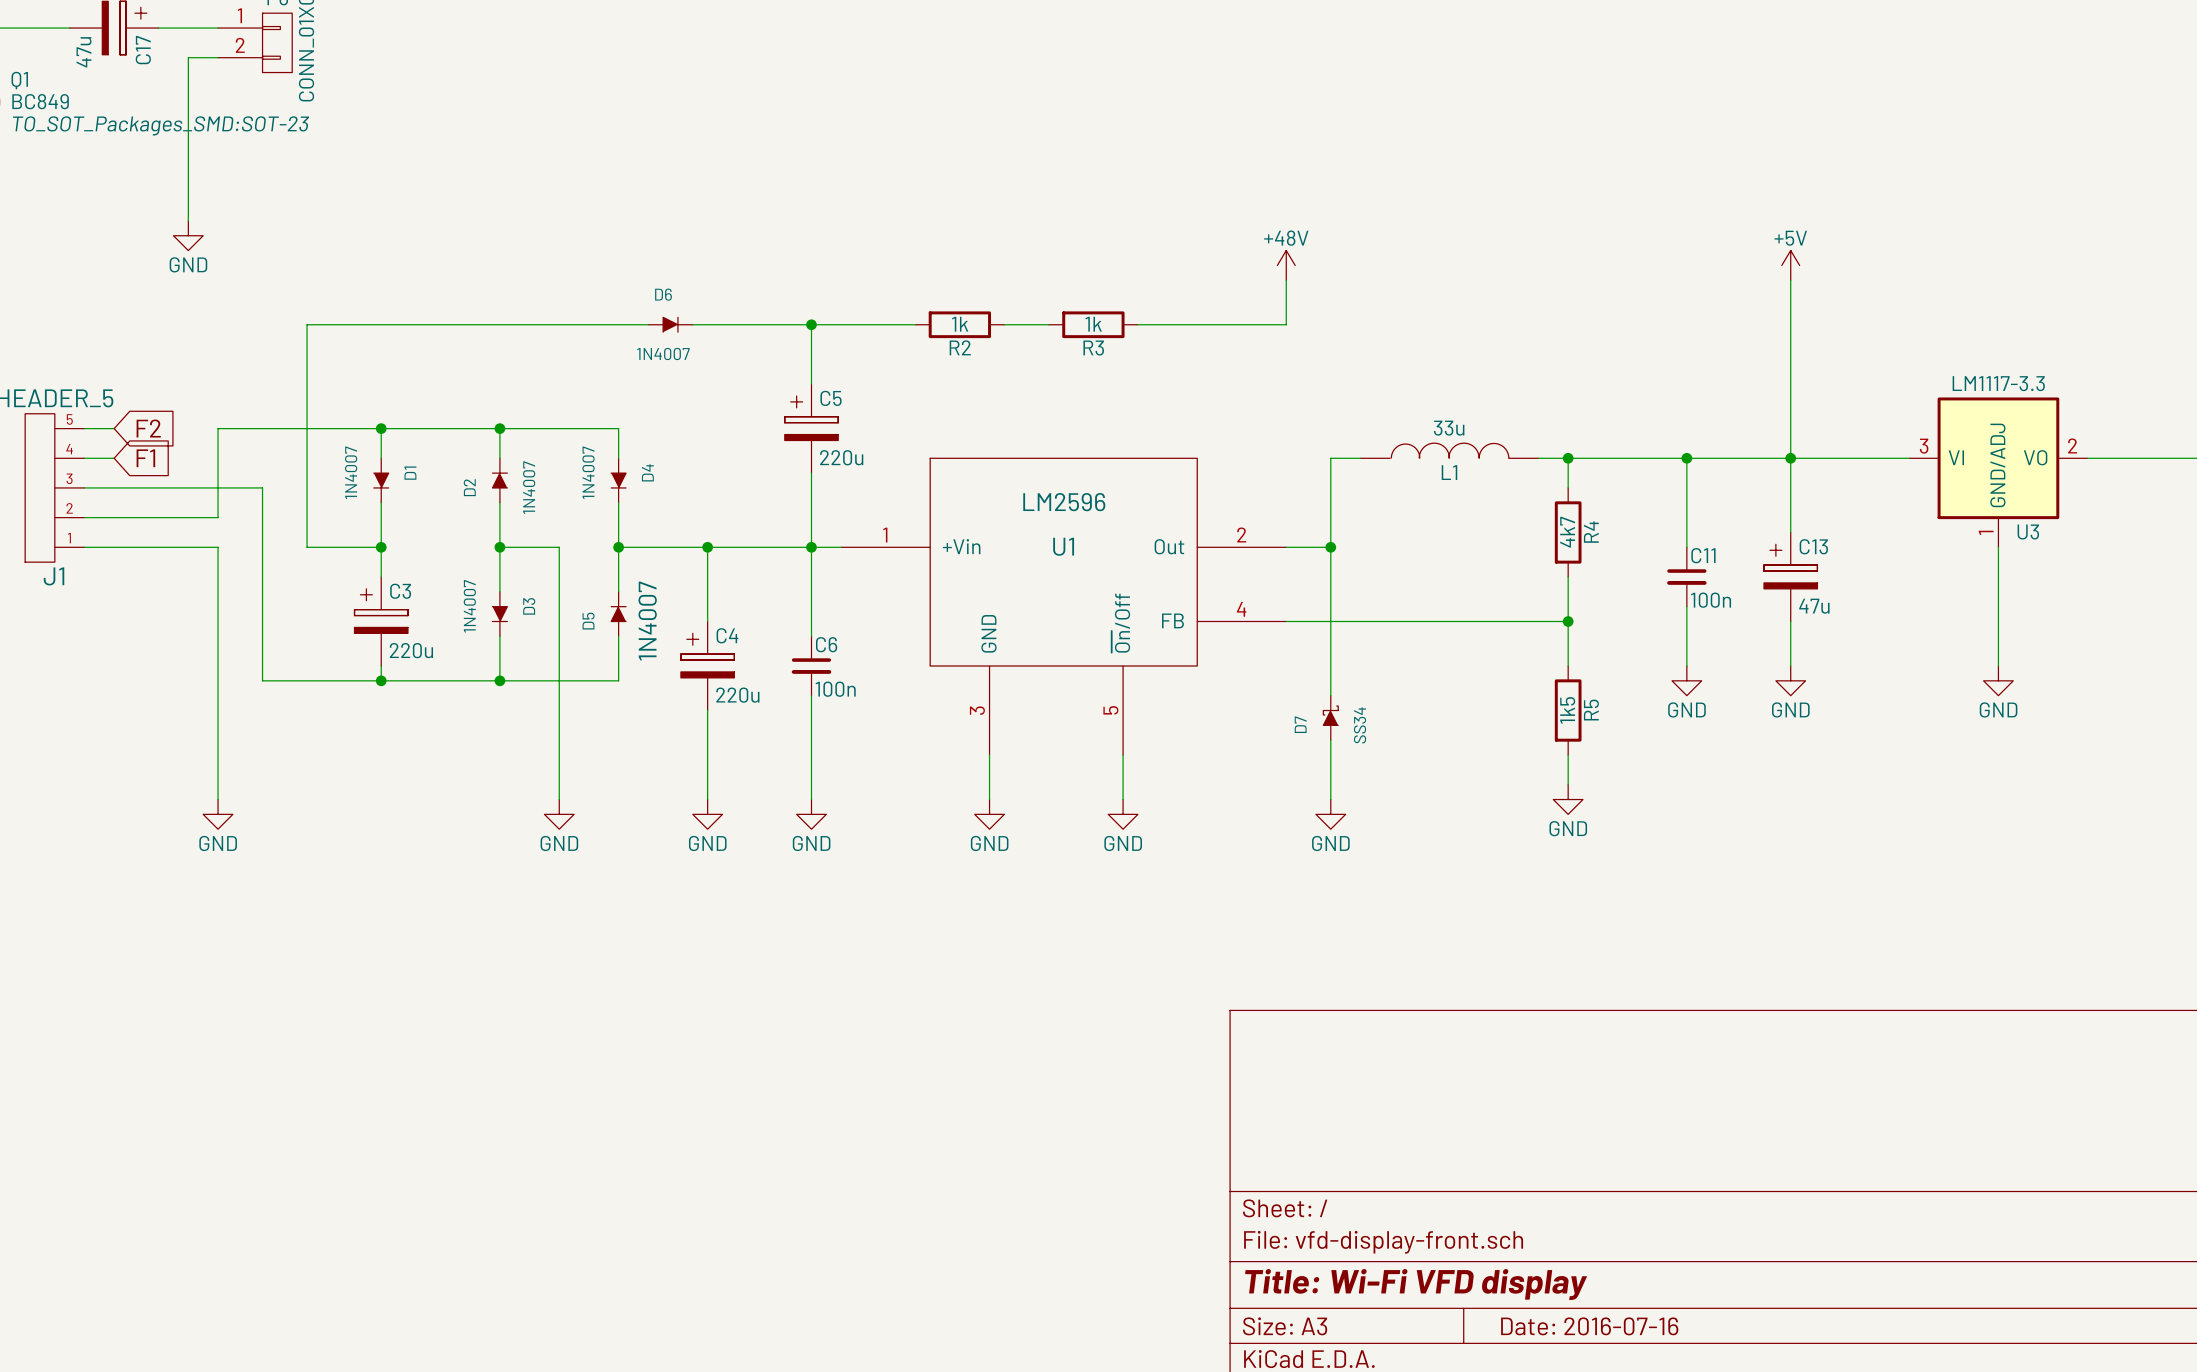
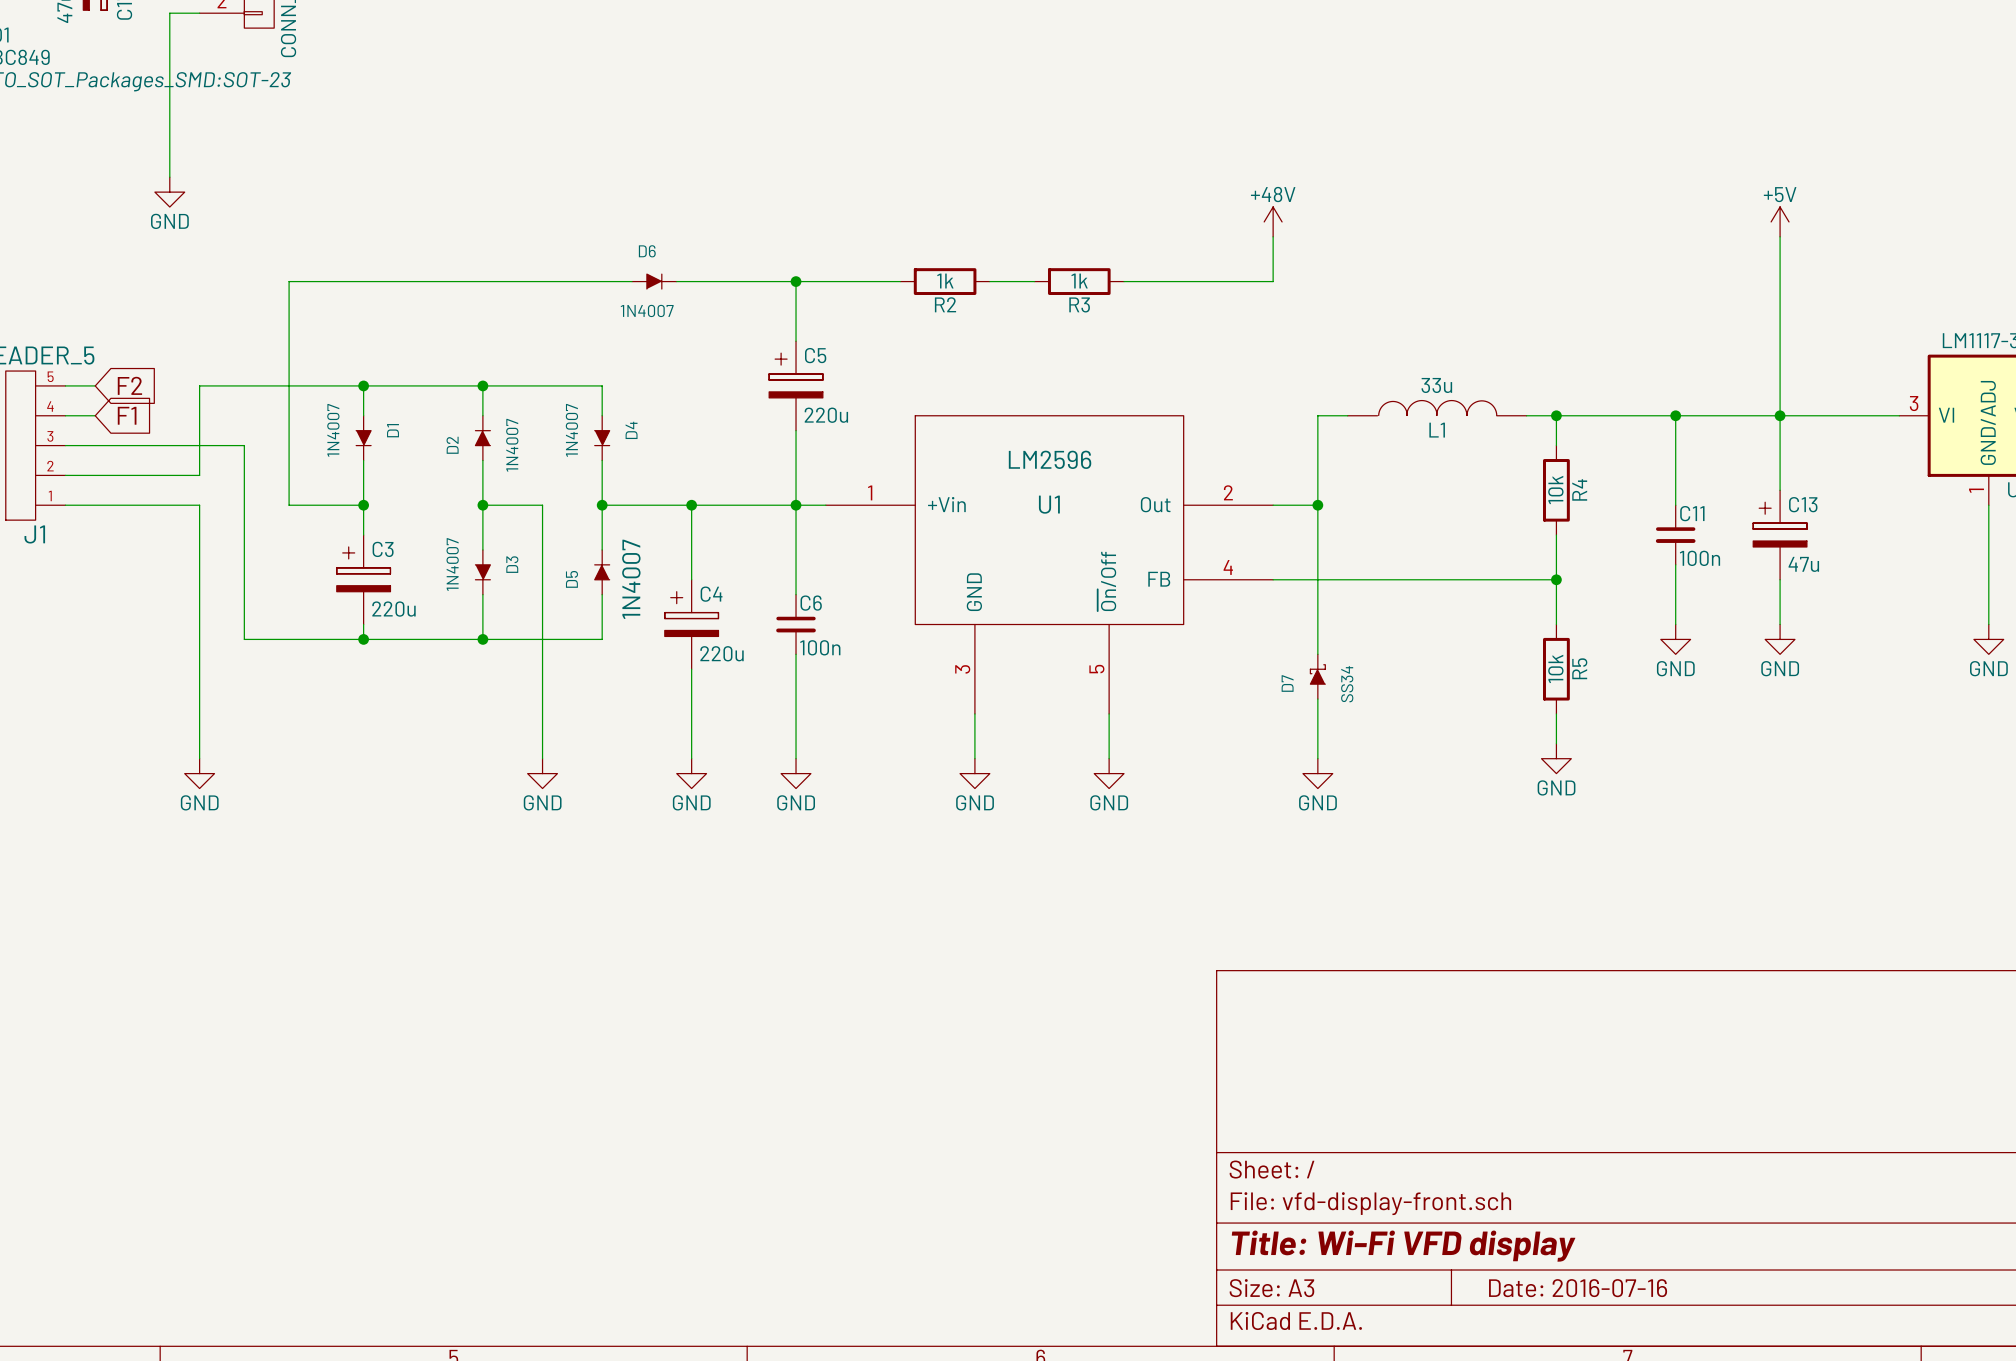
R4 value: 4k7 (1567, 532) -> 10k (1555, 490)
R5 value: 1k5 (1567, 710) -> 10k (1555, 668)

